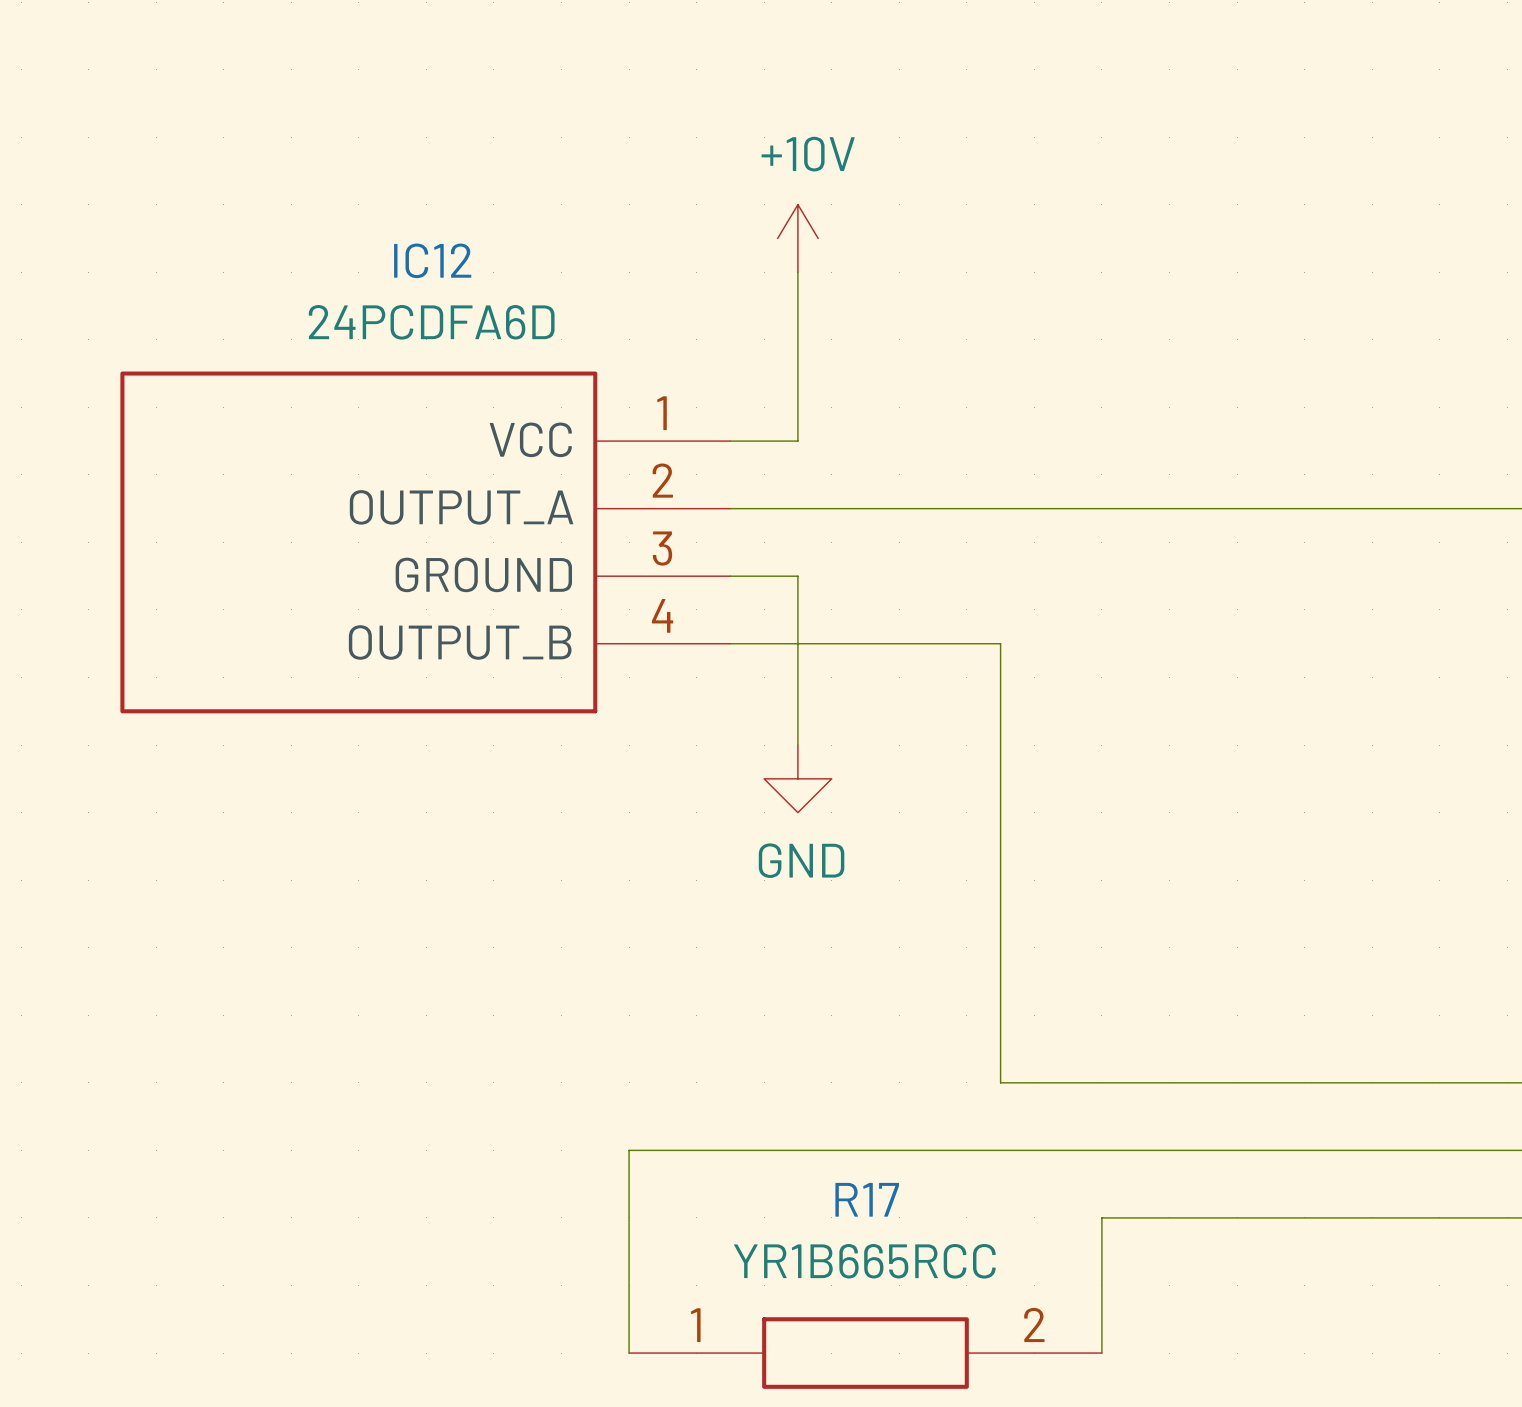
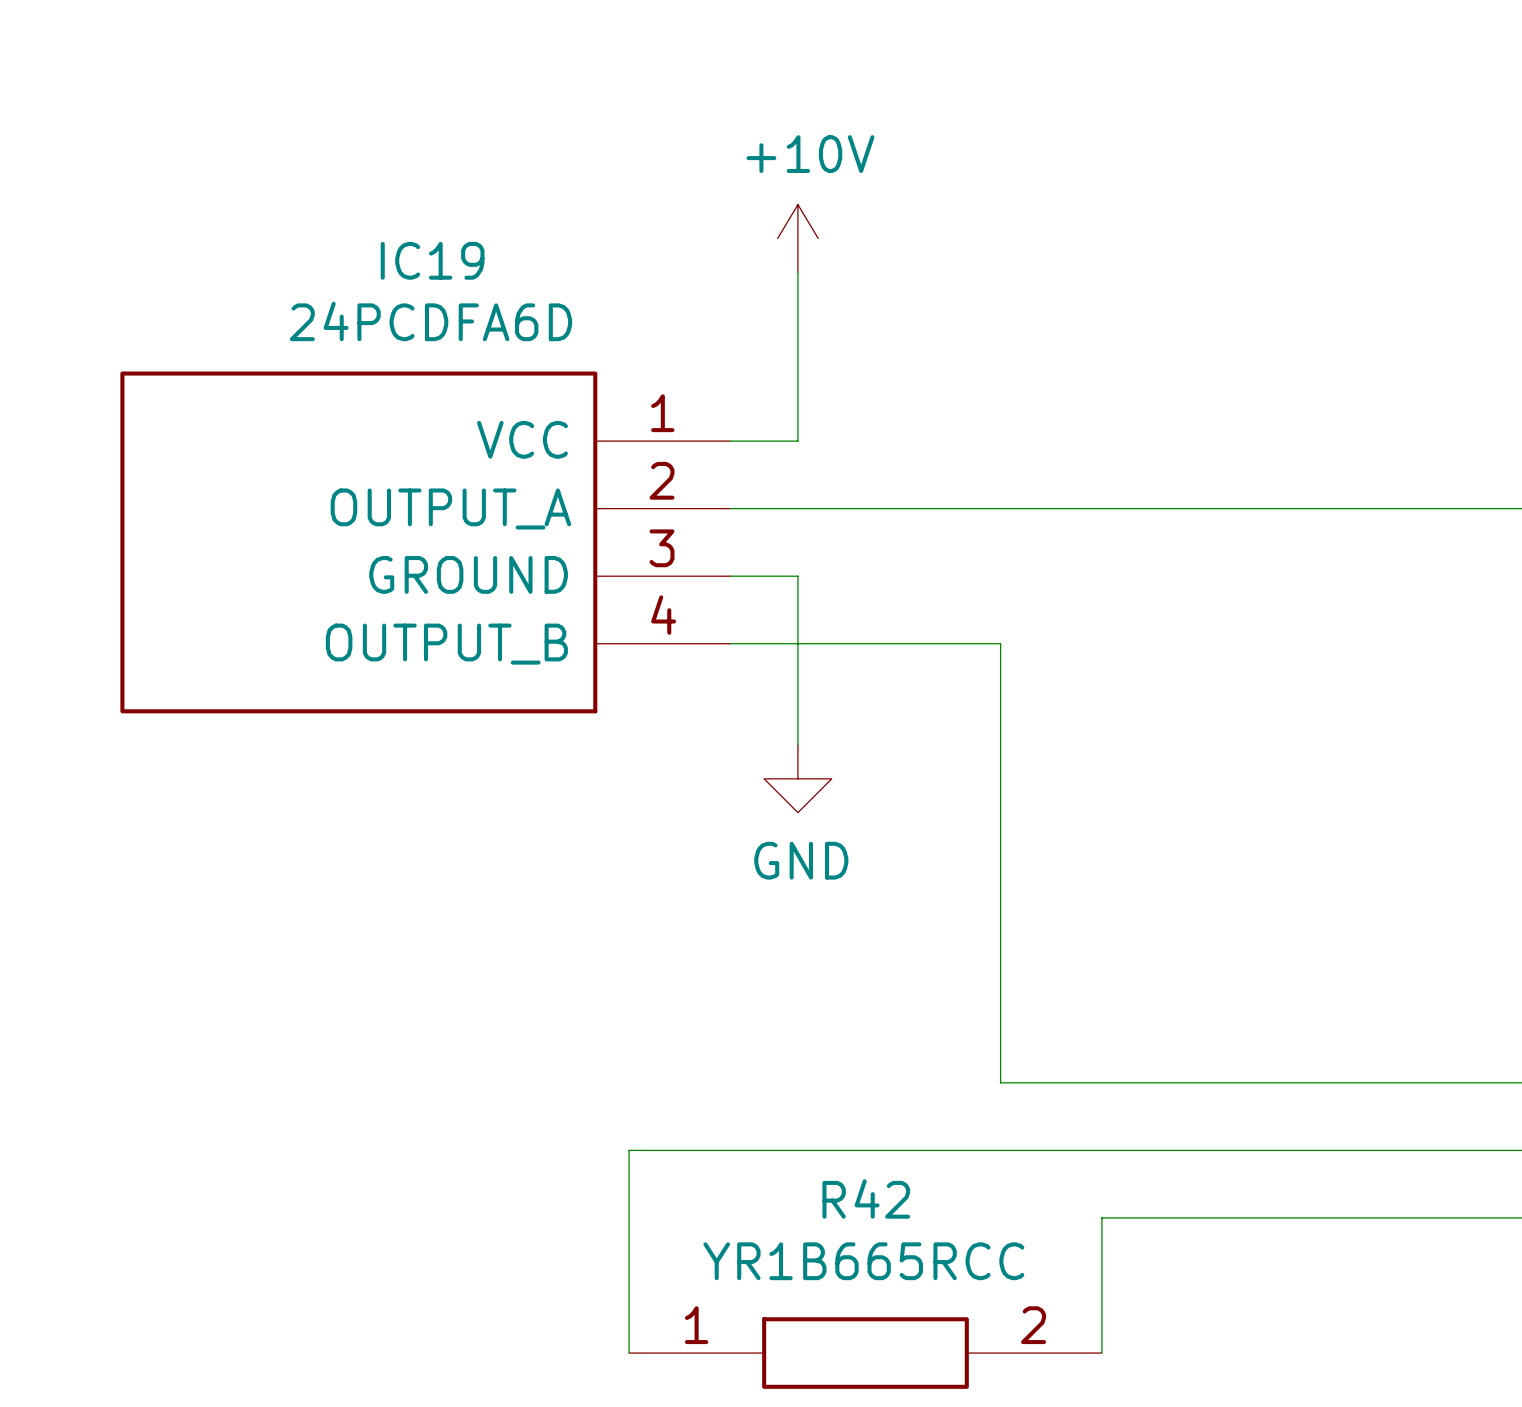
IC12 name: IC12 (432, 260) -> IC19 (432, 260)
R17 name: R17 (867, 1199) -> R42 (866, 1198)

